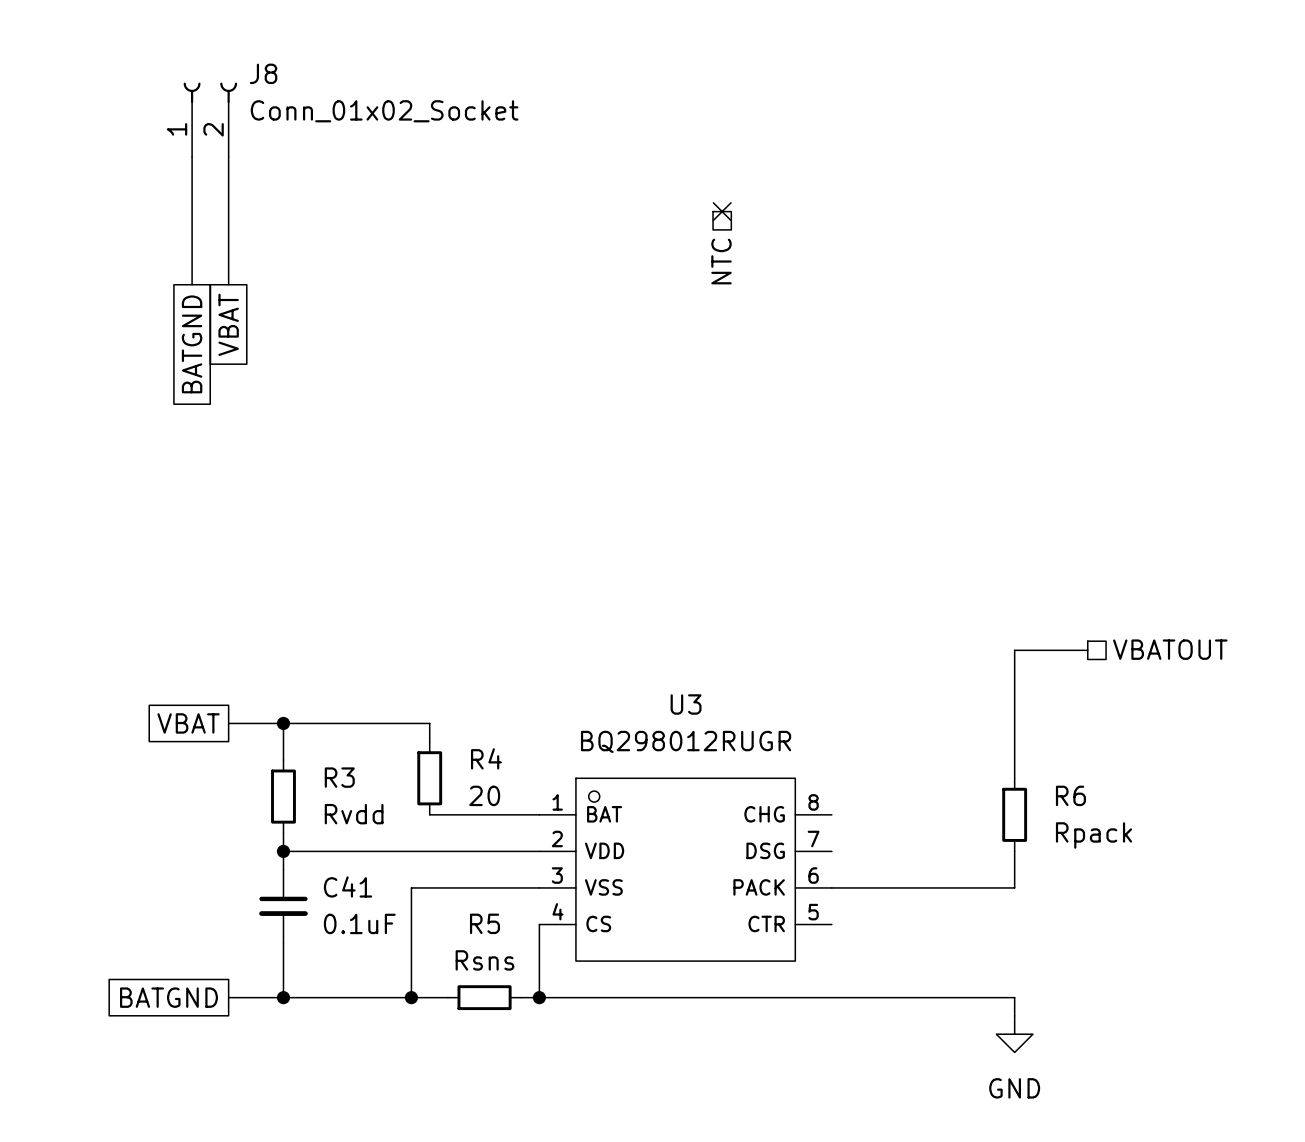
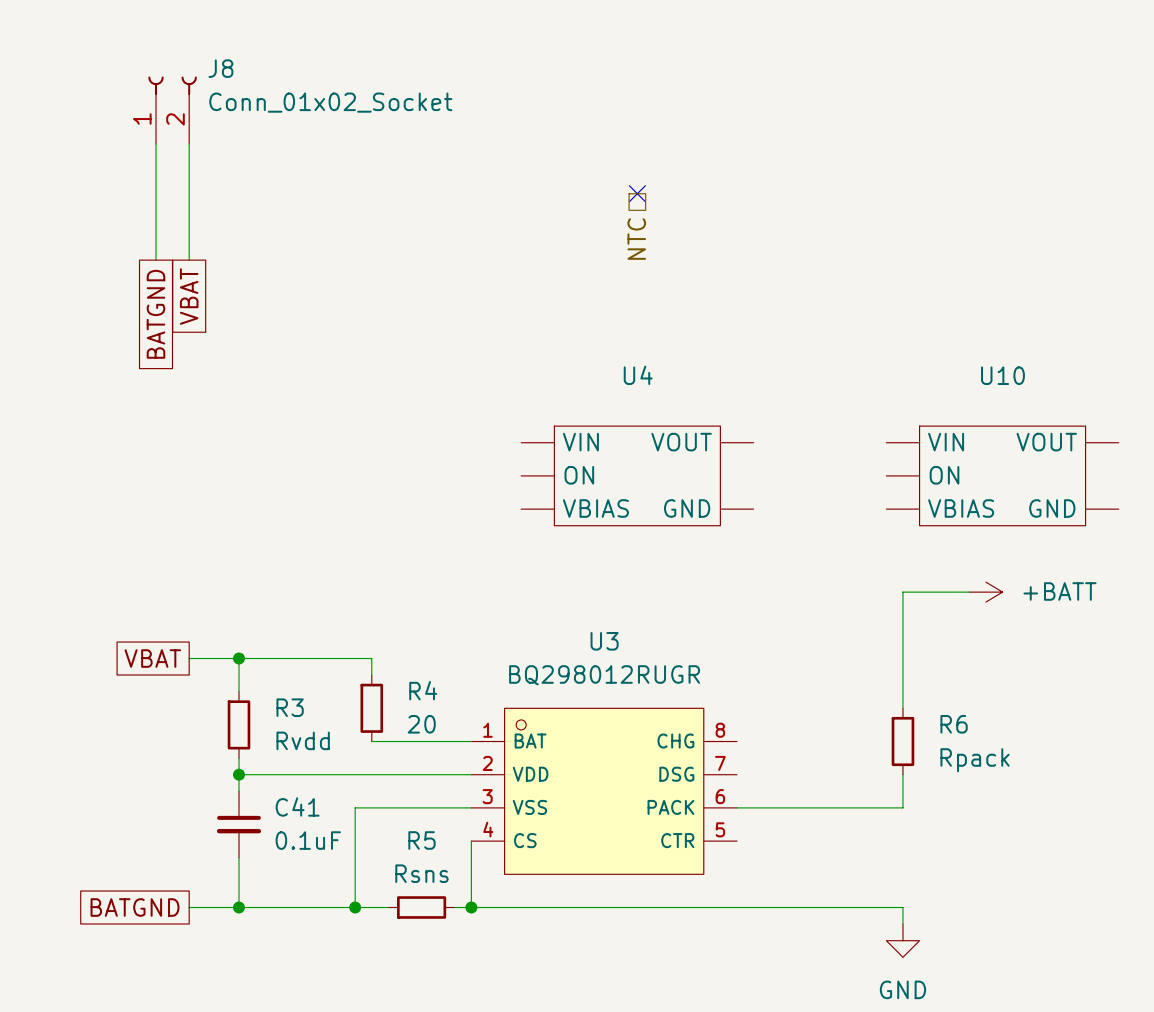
U4: none -> (637, 475)
U10: none -> (1002, 475)
hierarchical label: VBATOUT (1170, 649) -> none
power symbol: none -> +BATT (985, 592)

